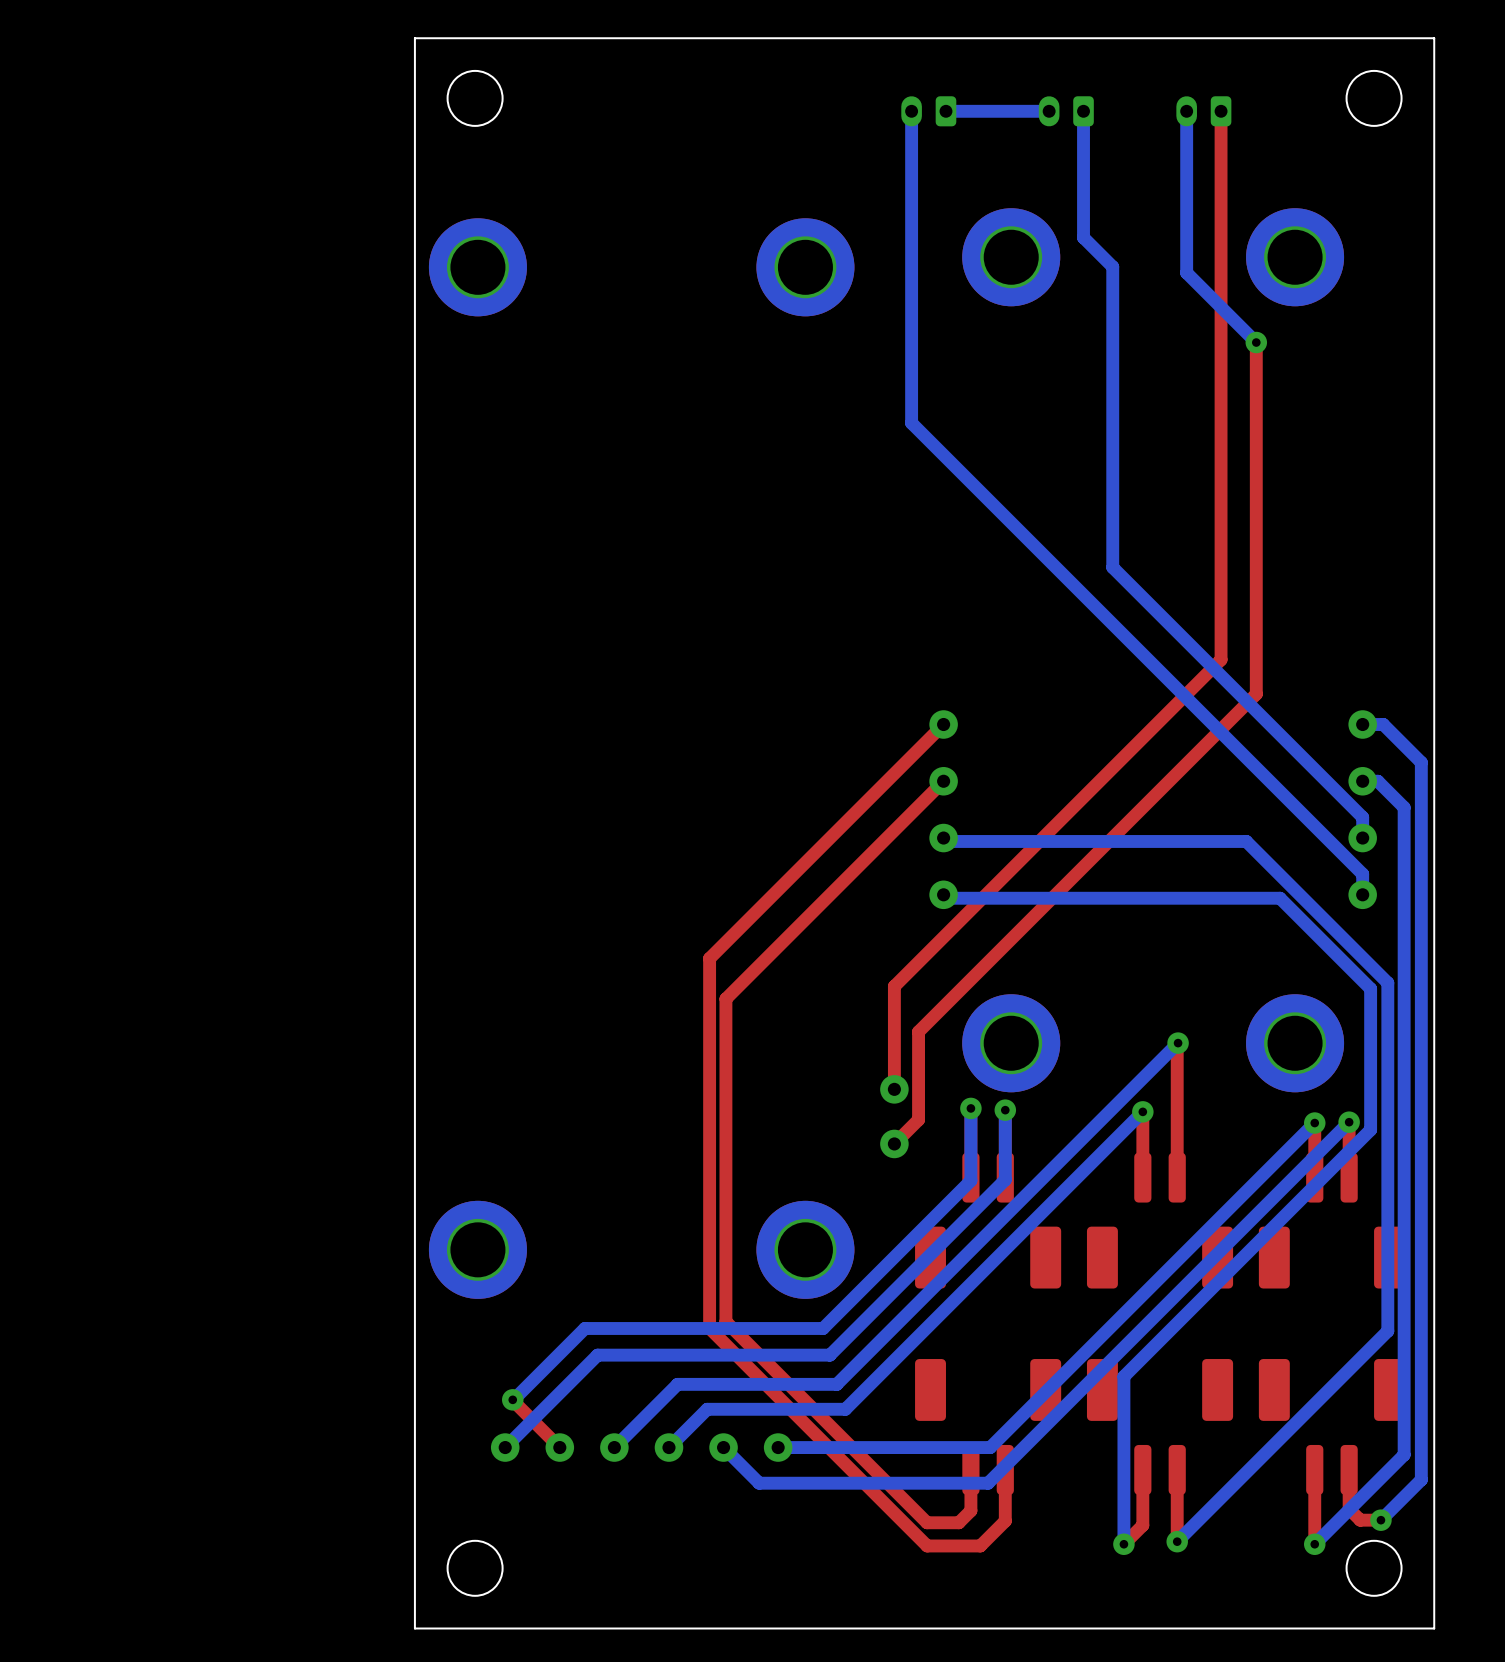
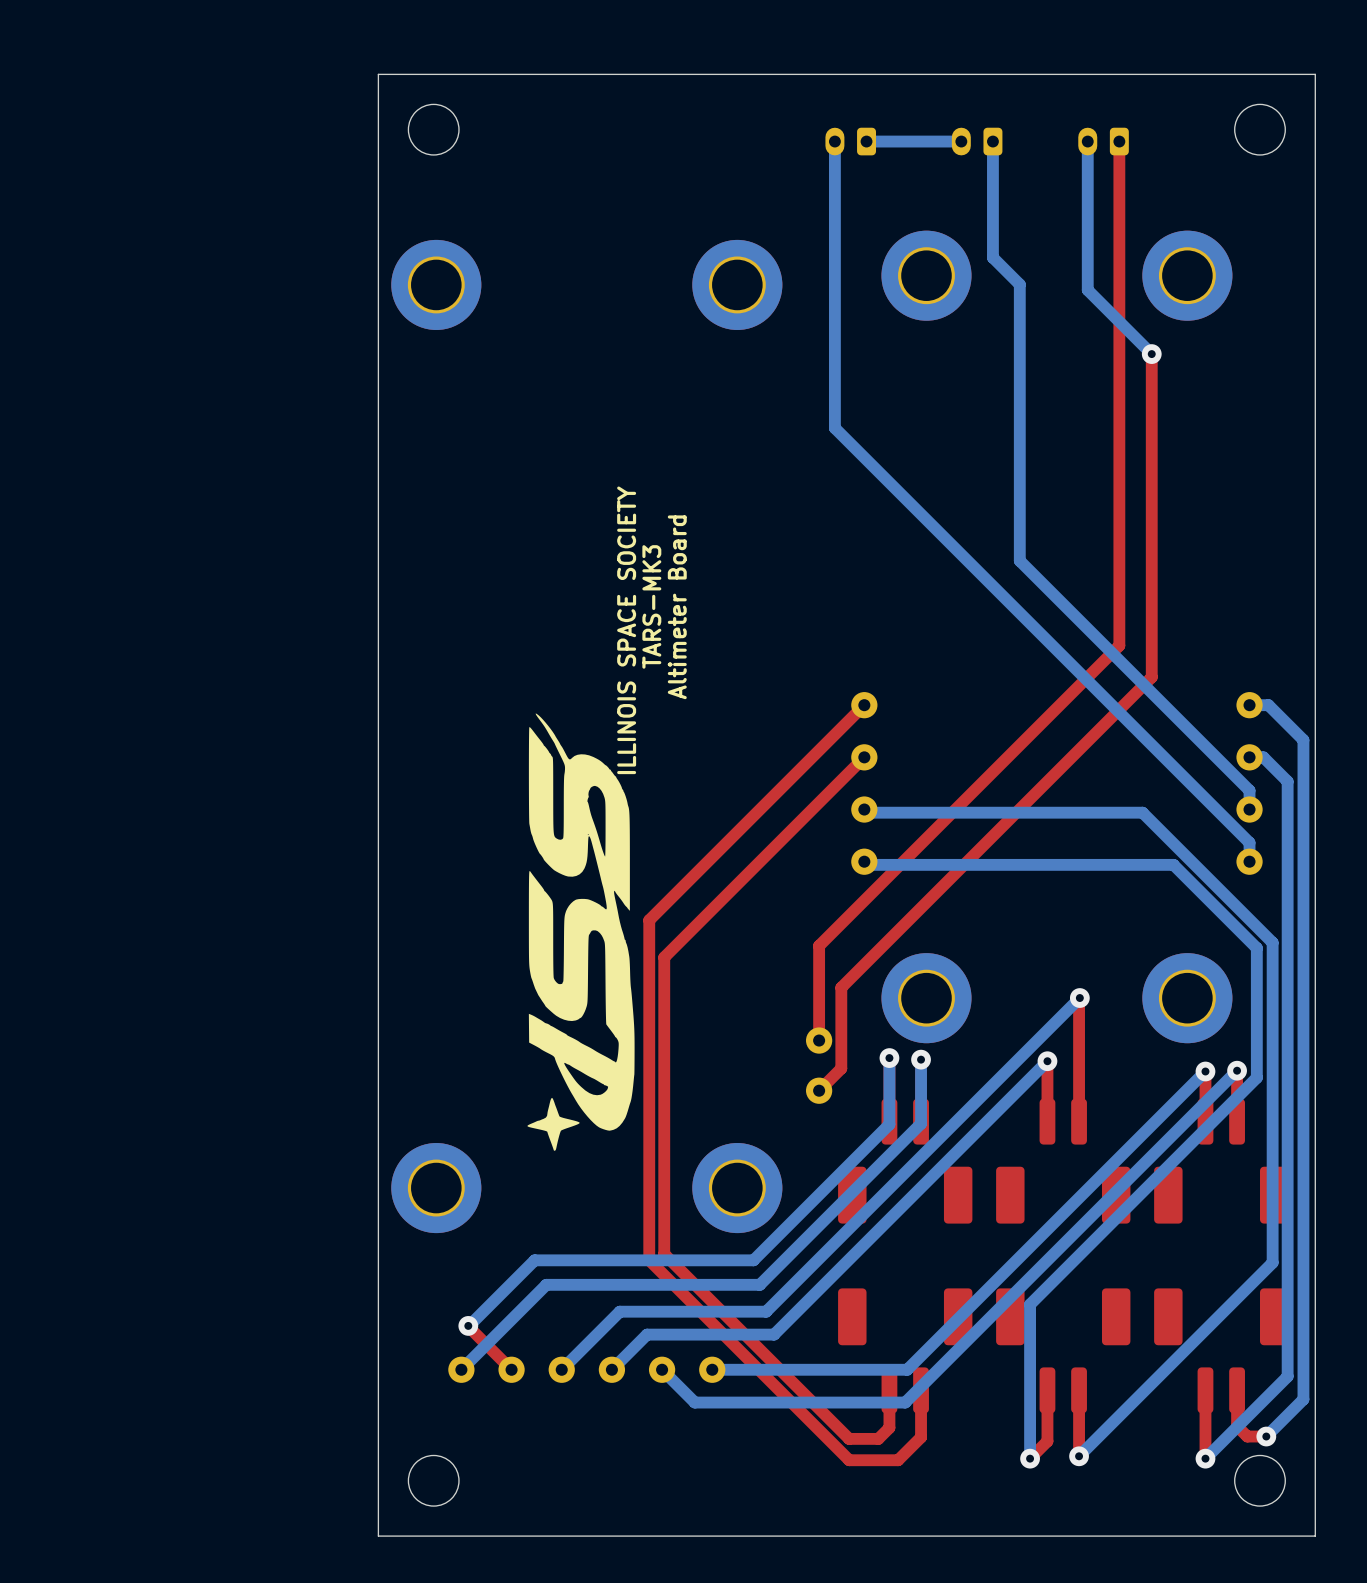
text: none -> TARS-MK3 (651, 606)
text: none -> Altimeter Board (677, 607)
text: none -> ILLINOIS SPACE SOCIETY (626, 630)
drawing: none -> [527, 713, 635, 1151]

